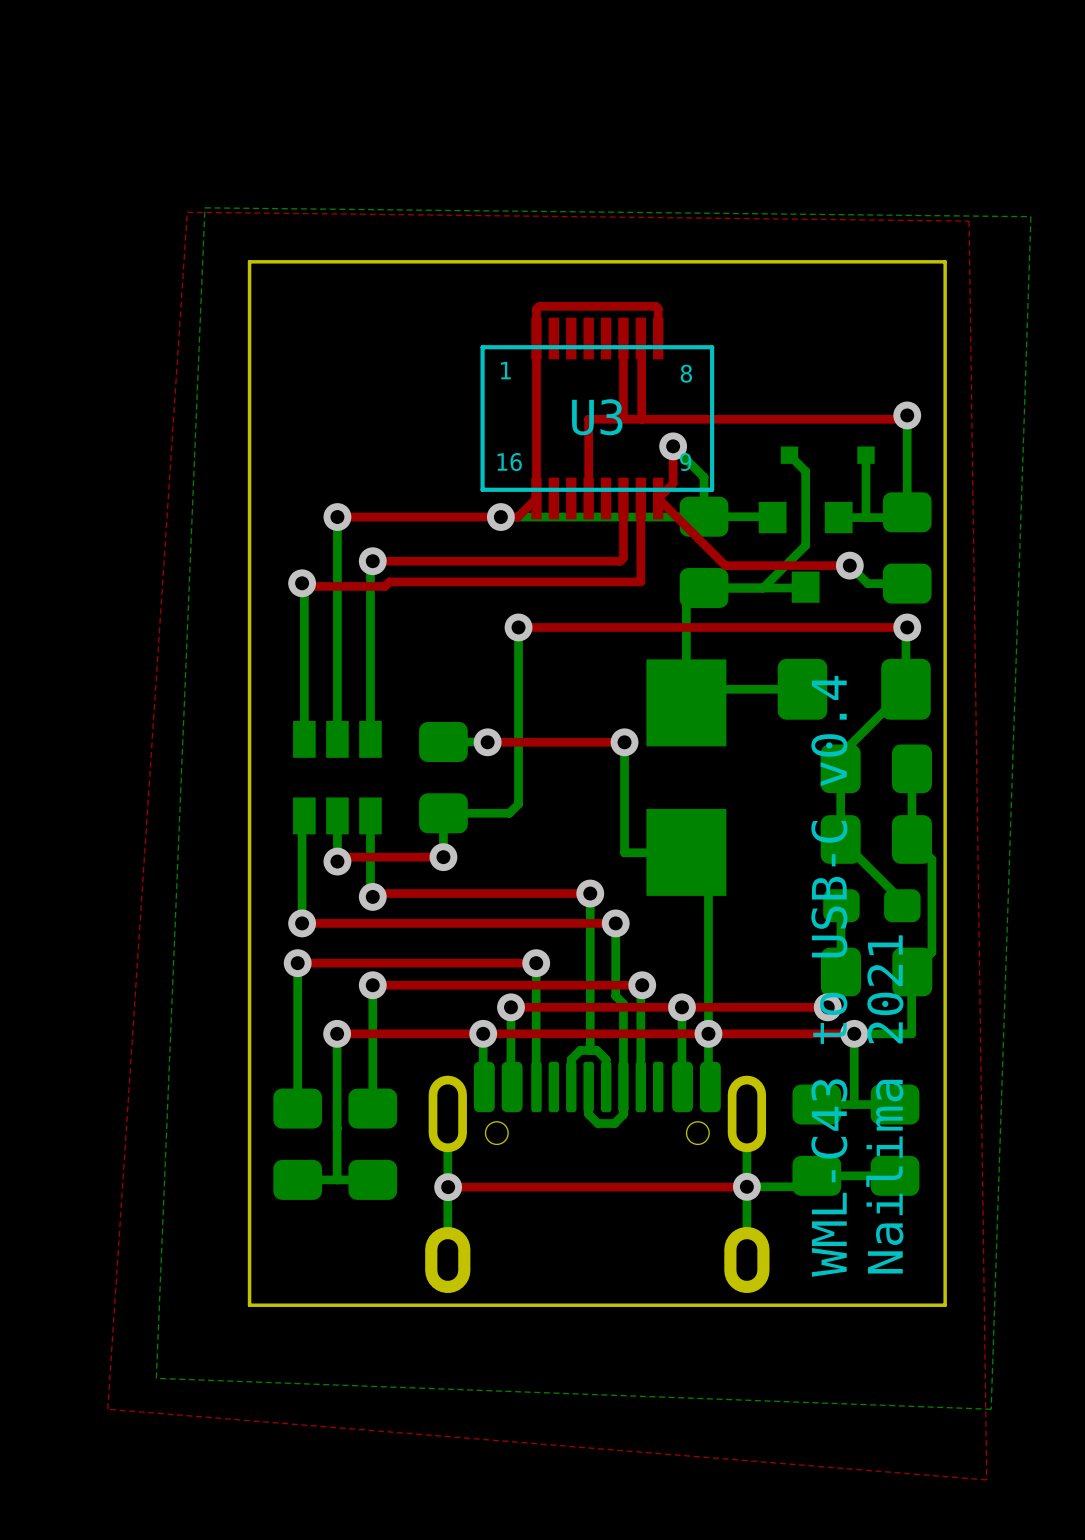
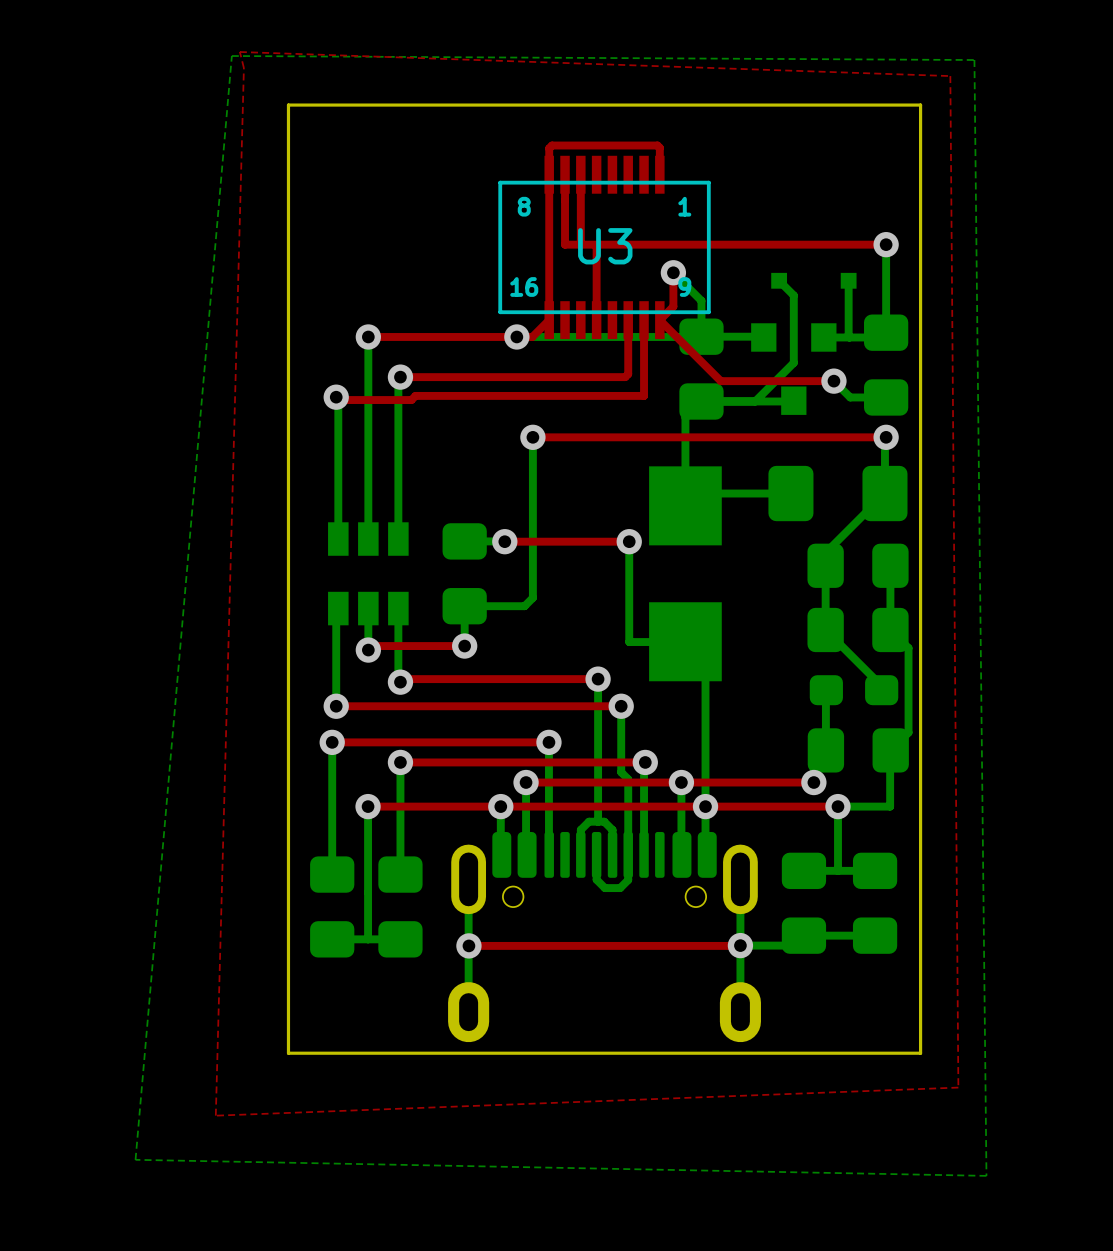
bottom zone outline: (204, 207) (156, 1378) (991, 1409) (1030, 216) (204, 207) -> (231, 56) (135, 1159) (986, 1175) (974, 60) (231, 56)
top zone outline: (187, 212) (107, 1409) (986, 1479) (969, 221) (187, 212) -> (239, 51) (243, 68) (215, 1115) (958, 1087) (950, 76) (239, 51)
top track: none -> (580, 174) (580, 244)
top track: (623, 338) (623, 415) (619, 419) -> none
top track: (640, 338) (641, 419) -> none
U3 text position: 1 (505, 370) -> 1 (684, 206)
U3 text position: 8 (686, 373) -> 8 (524, 206)
top track: (907, 415) (903, 419) (588, 419) -> (886, 244) (565, 244) (565, 174)
text: WML-C43 to USB-C v0.4 (829, 976) -> none
text: Nailima 2021 (884, 1104) -> none

